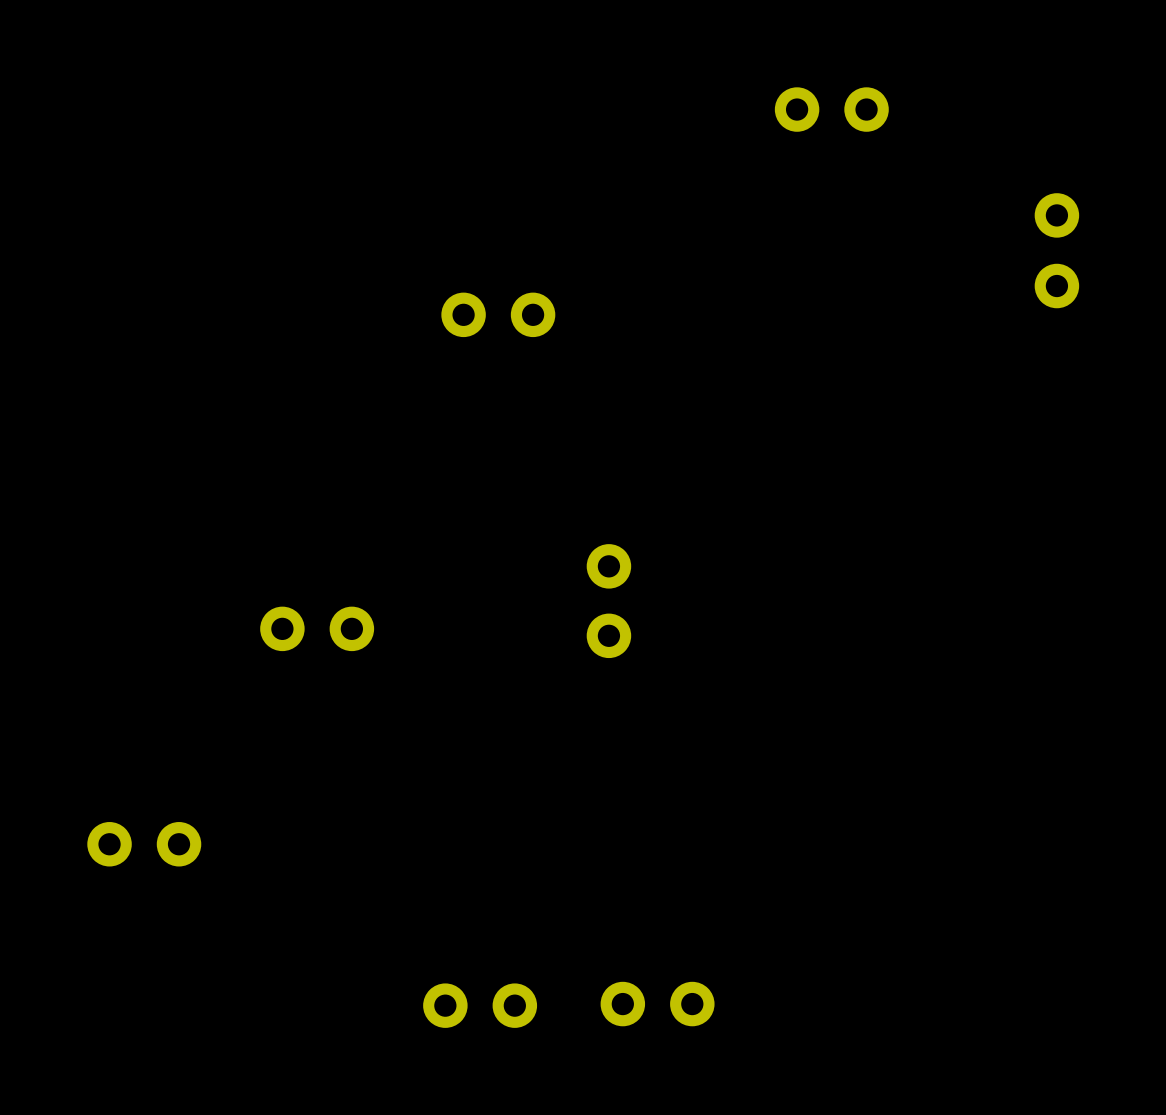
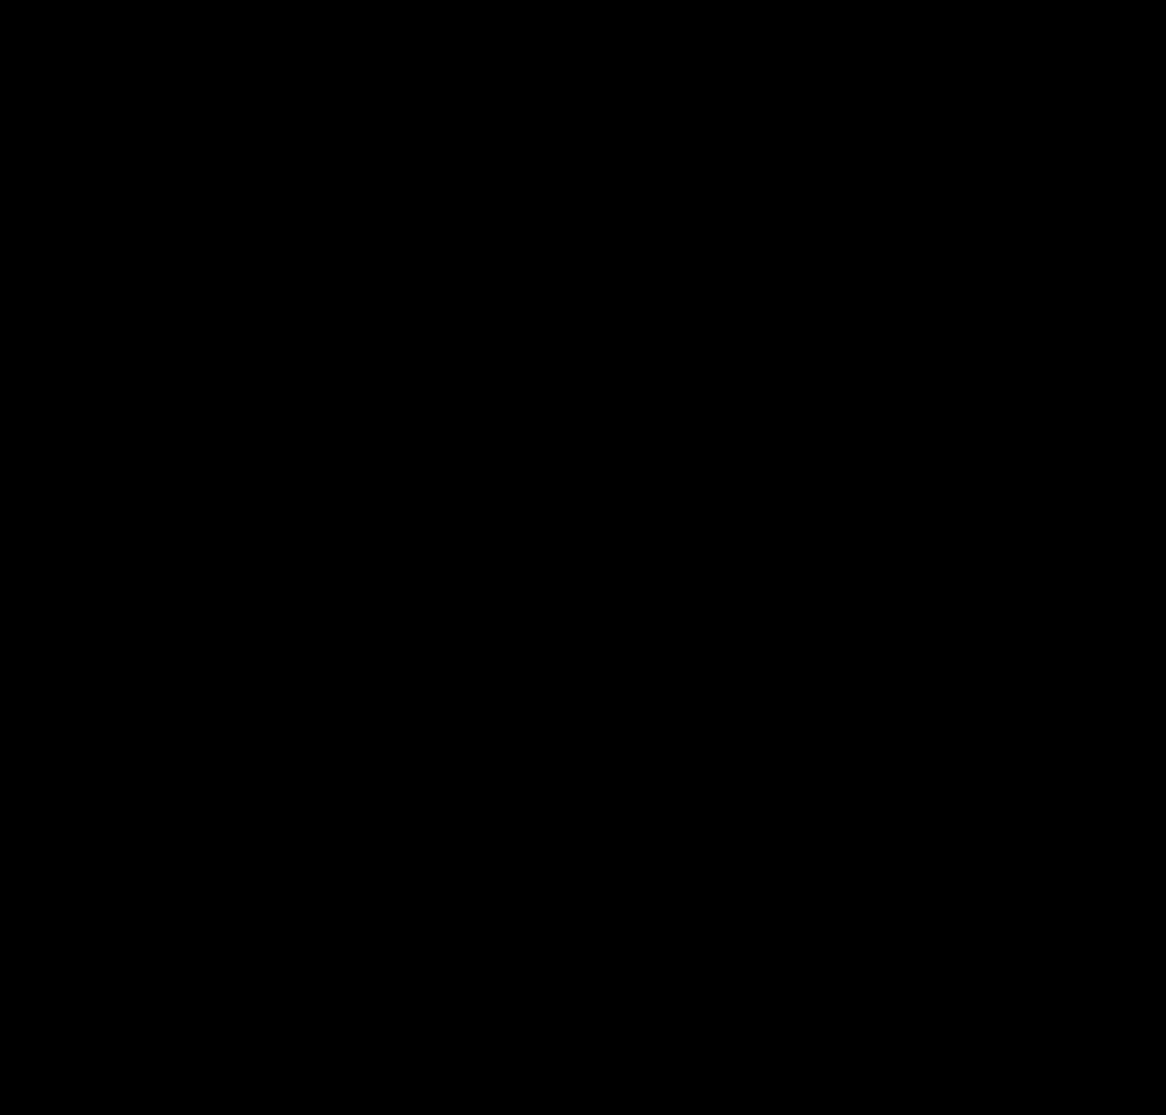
part: (831, 109) -> none
part: (1056, 250) -> none
part: (498, 314) -> none
part: (608, 601) -> none
part: (317, 628) -> none
part: (144, 844) -> none
part: (657, 1004) -> none
part: (480, 1005) -> none

